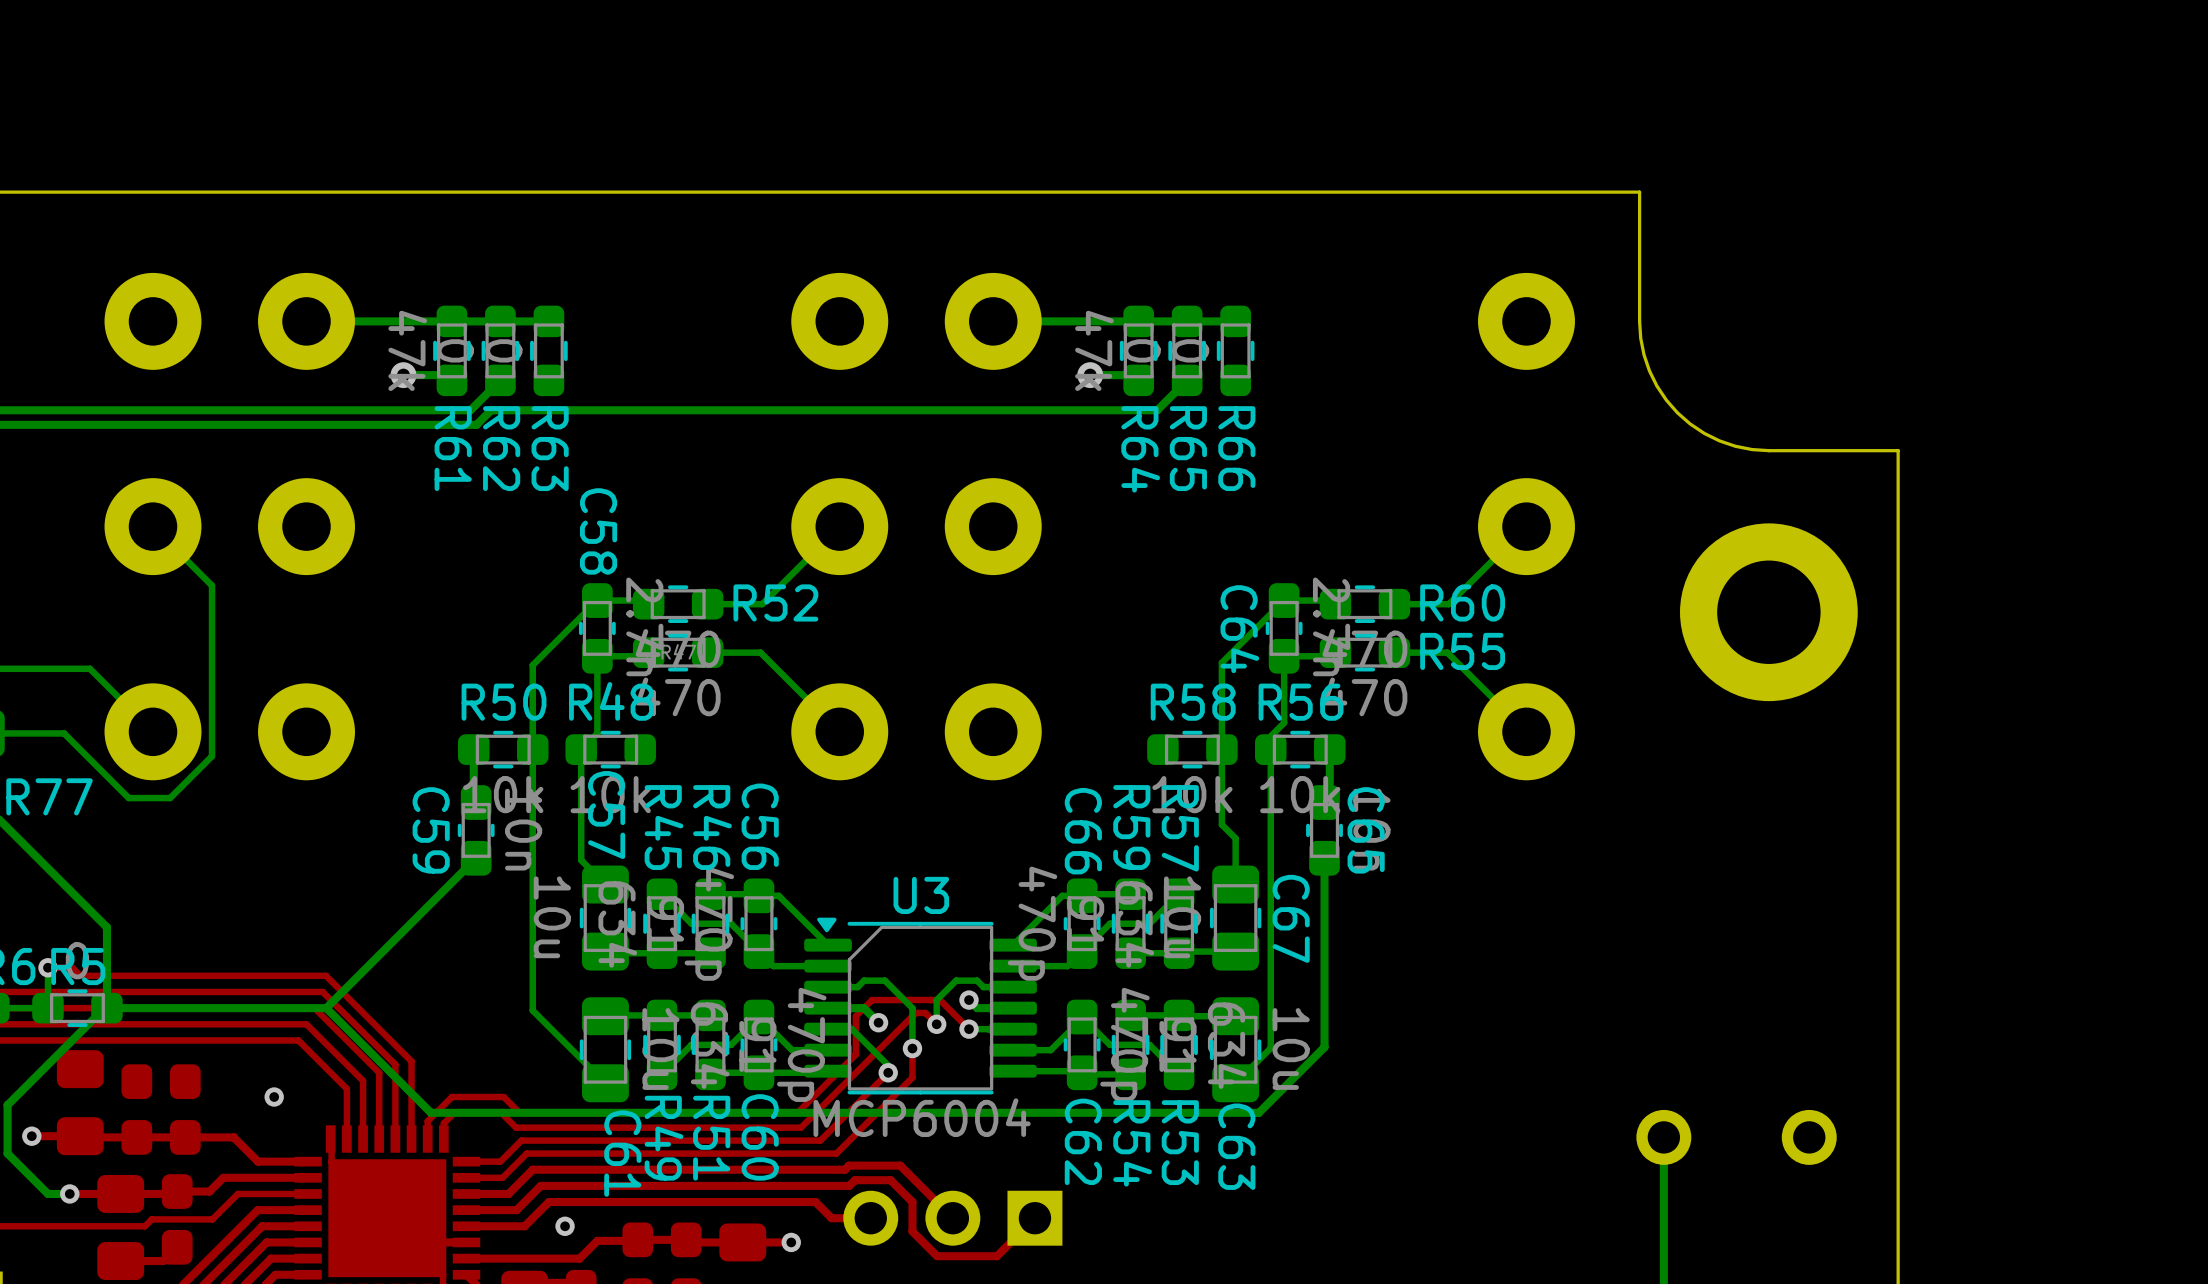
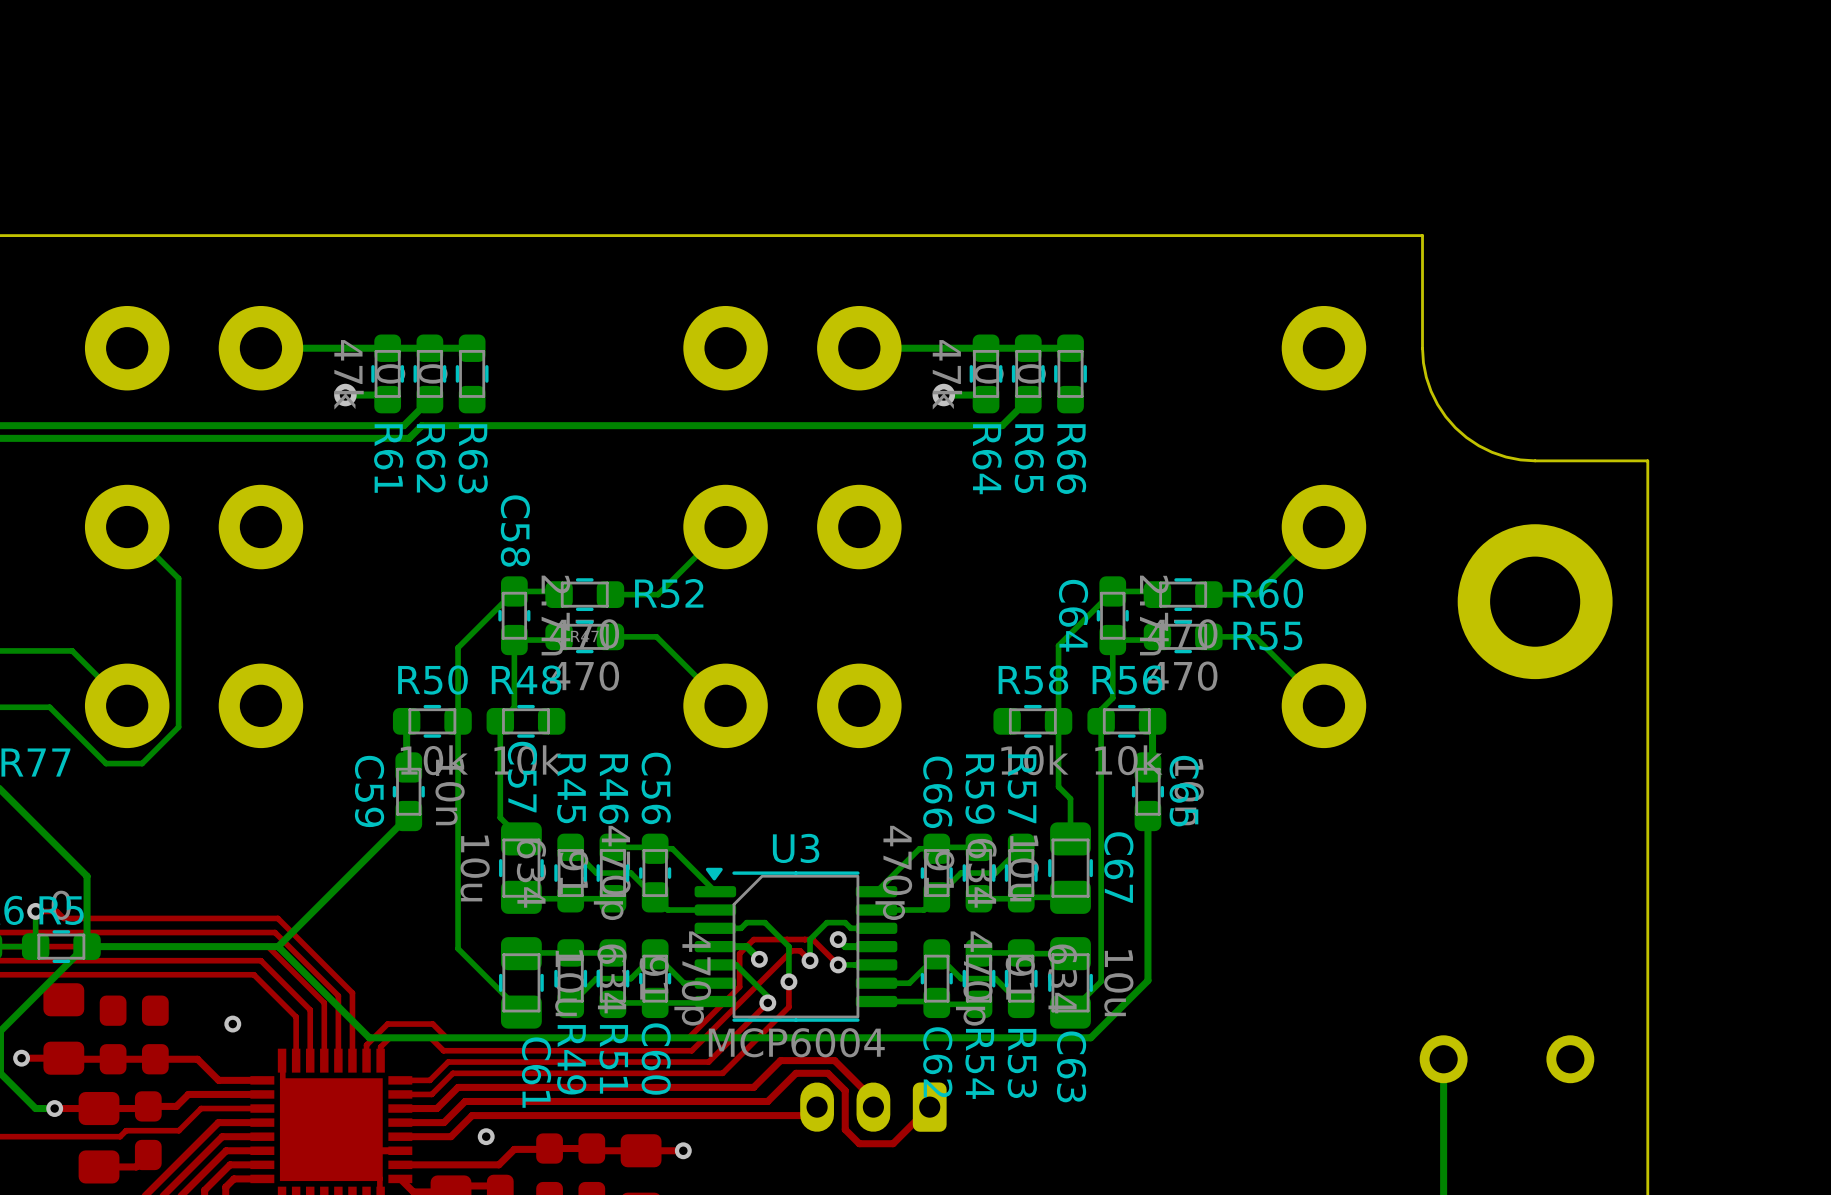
top track: (844, 1169) (848, 1165) (900, 1165) (952, 1218) -> (730, 1087) (753, 1087) (780, 1060) (834, 1060) (873, 1099) (873, 1107)
top track: (849, 1185) (855, 1180) (890, 1180) (912, 1202) (912, 1231) (937, 1256) (996, 1256) (1034, 1218) -> (733, 1101) (767, 1101) (795, 1073) (827, 1073) (845, 1090) (845, 1129) (859, 1143) (893, 1143) (929, 1107)
part: none -> (873, 1107)
top track: (815, 1202) (831, 1218) (870, 1218) -> (704, 1115) (808, 1115) (817, 1107)
part: (952, 1218) -> none

